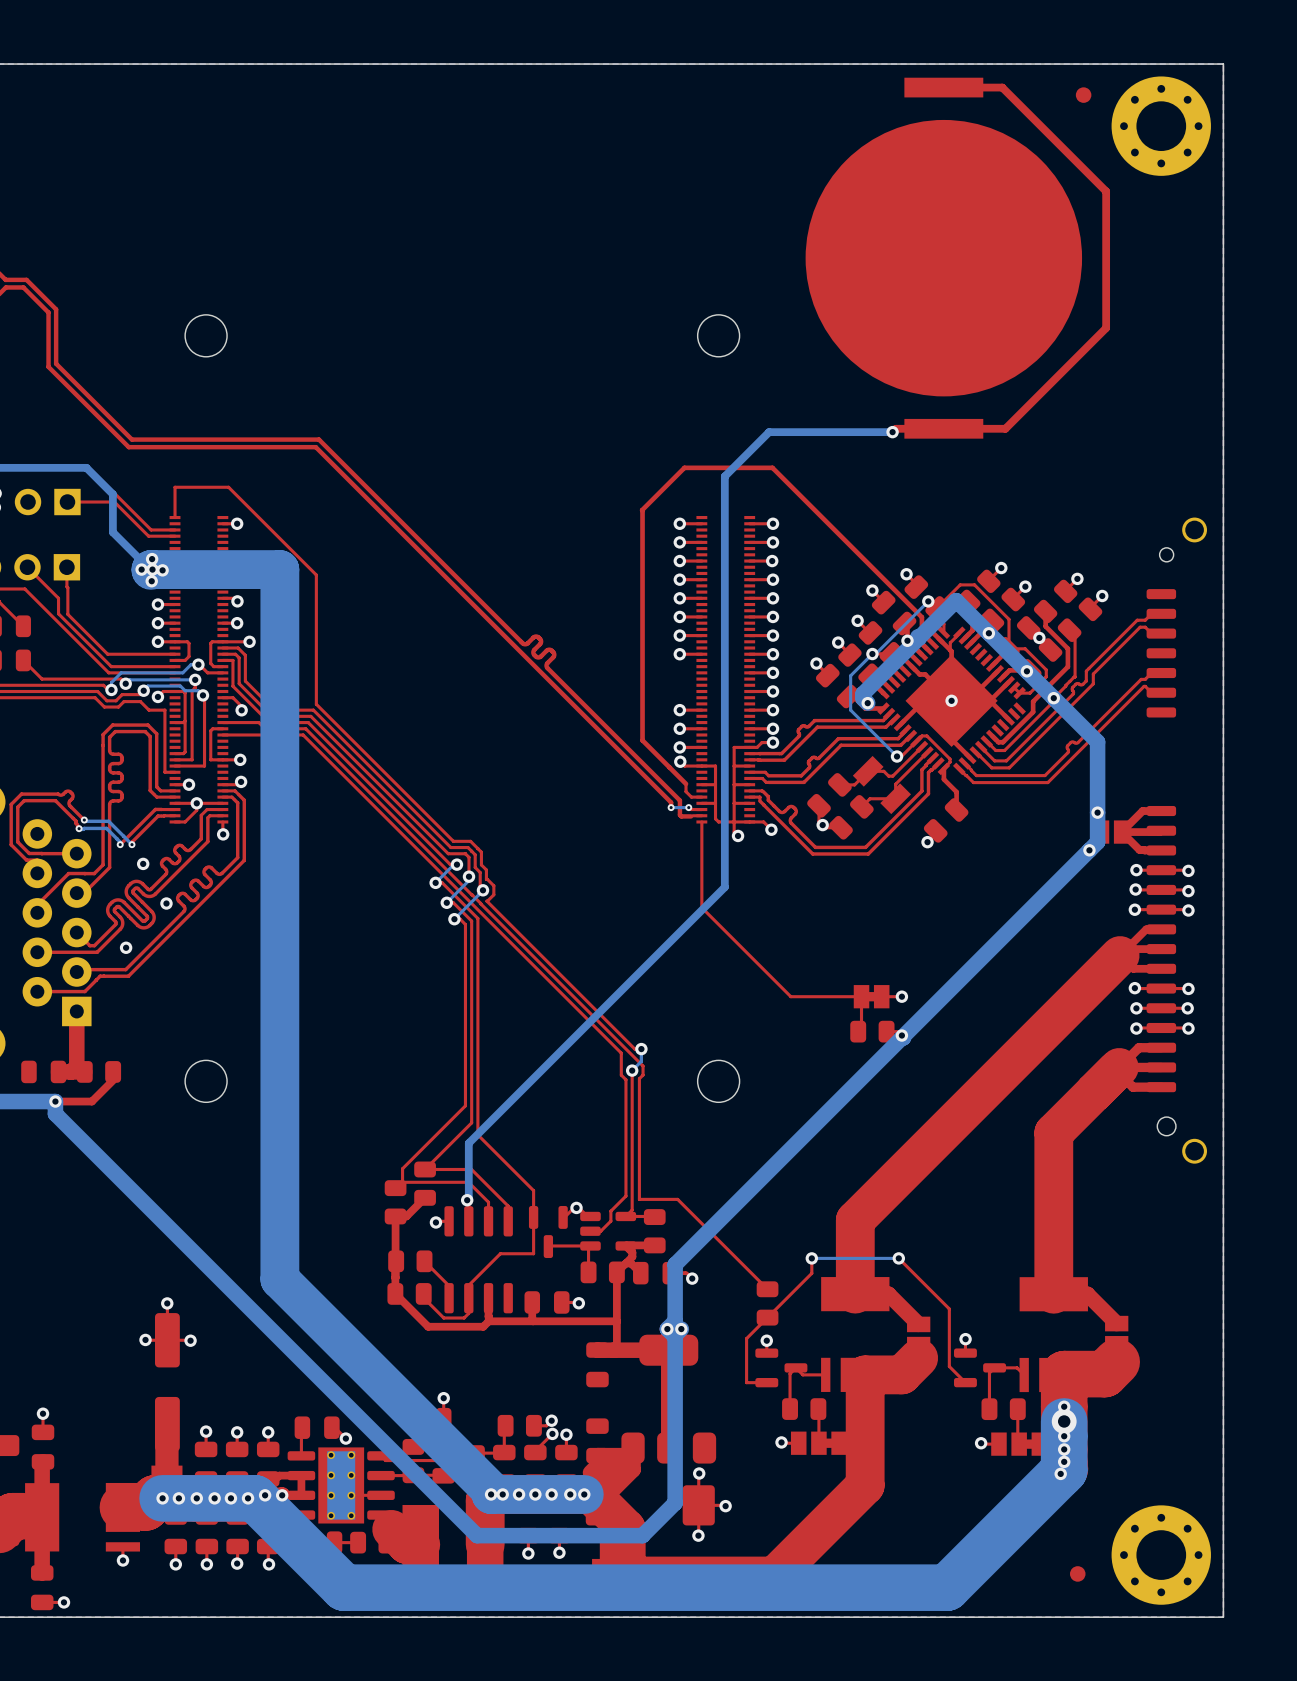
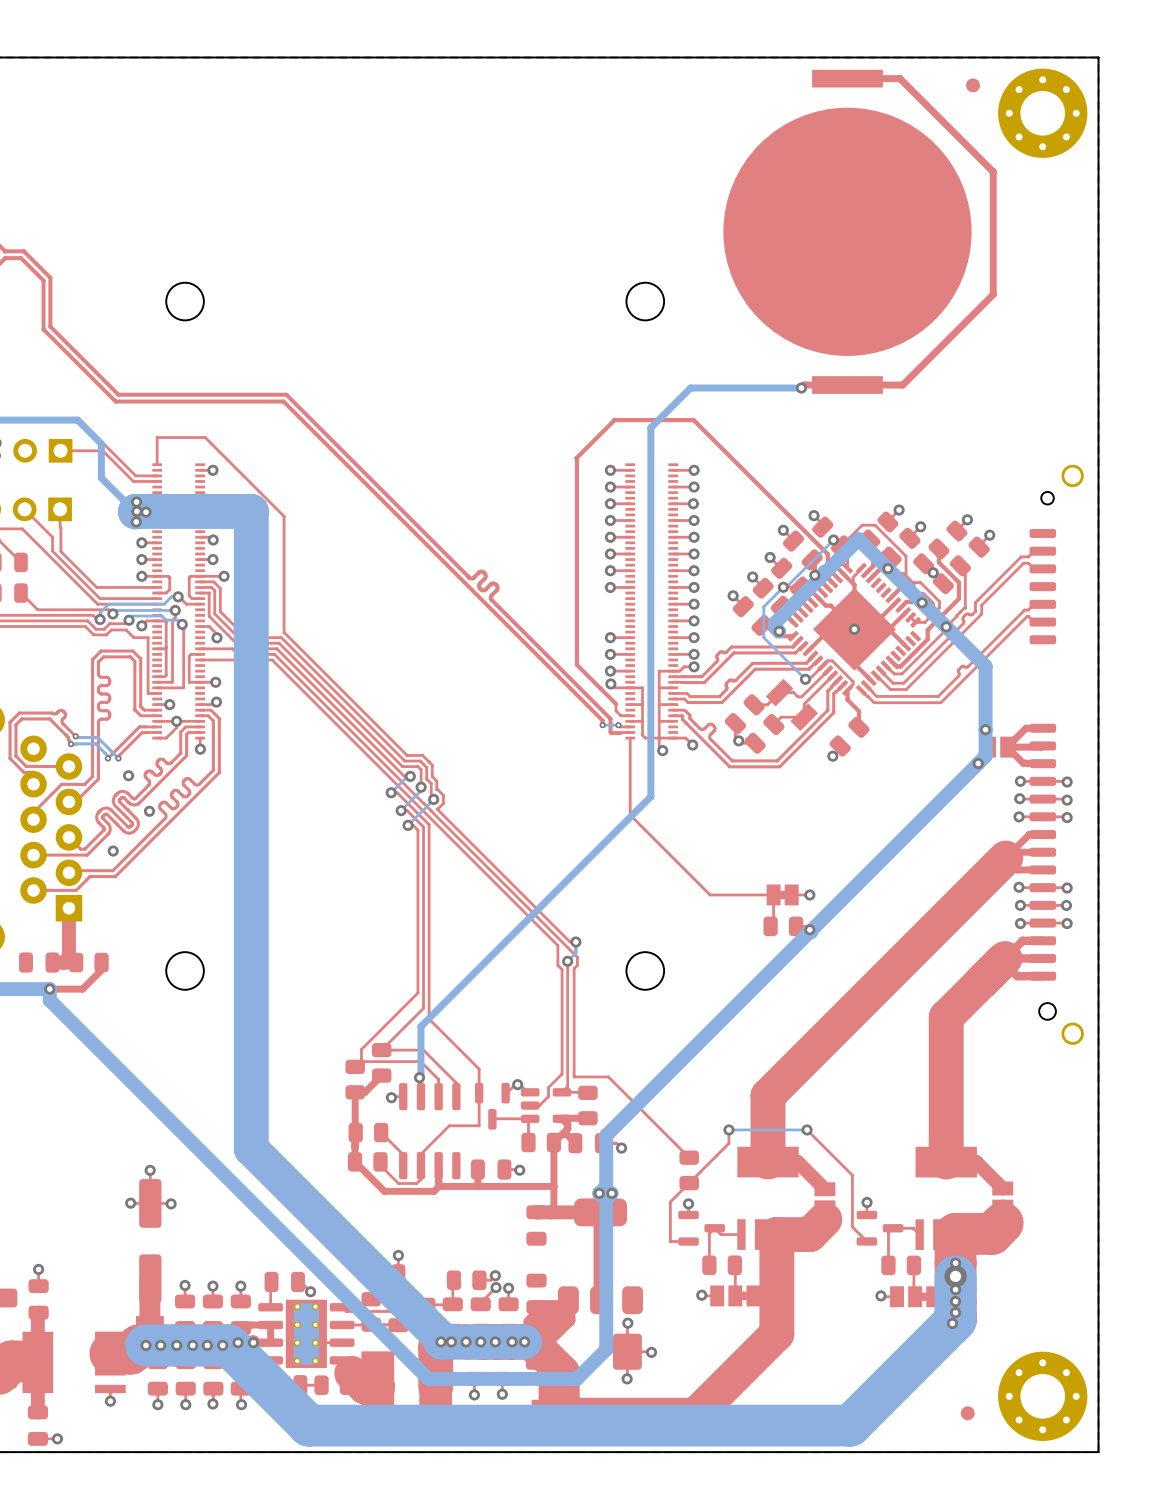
via: (141, 569) -> none

